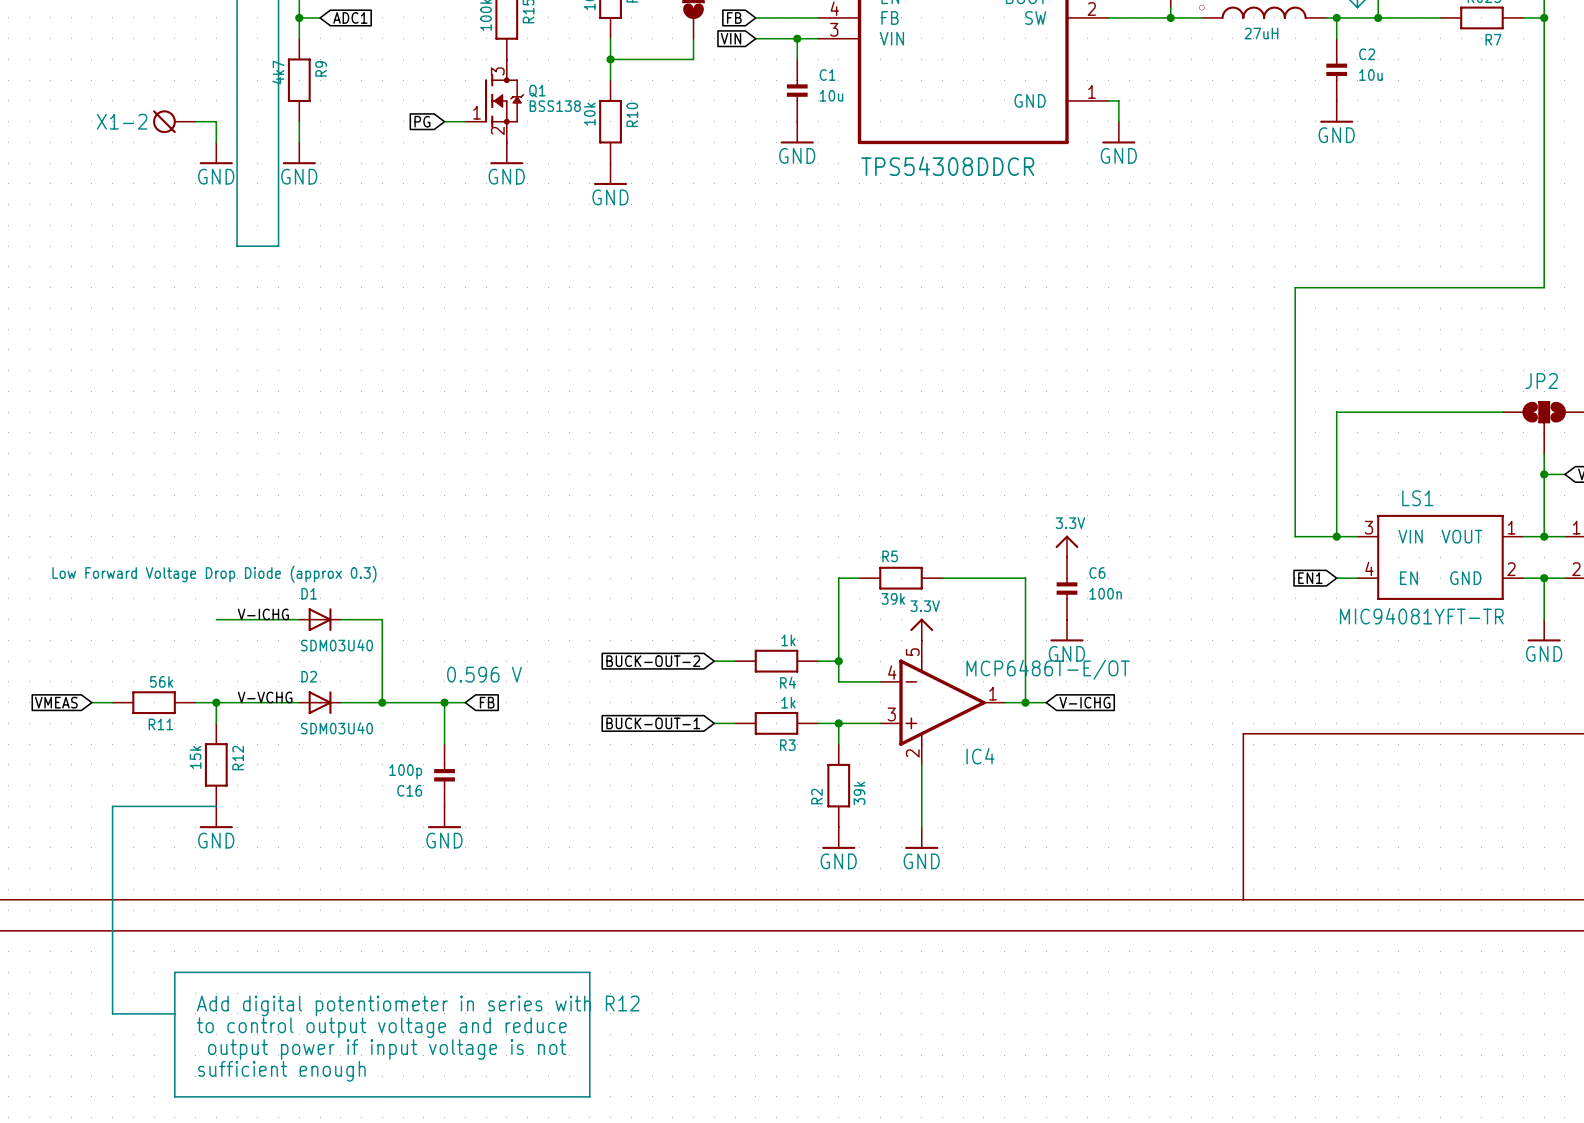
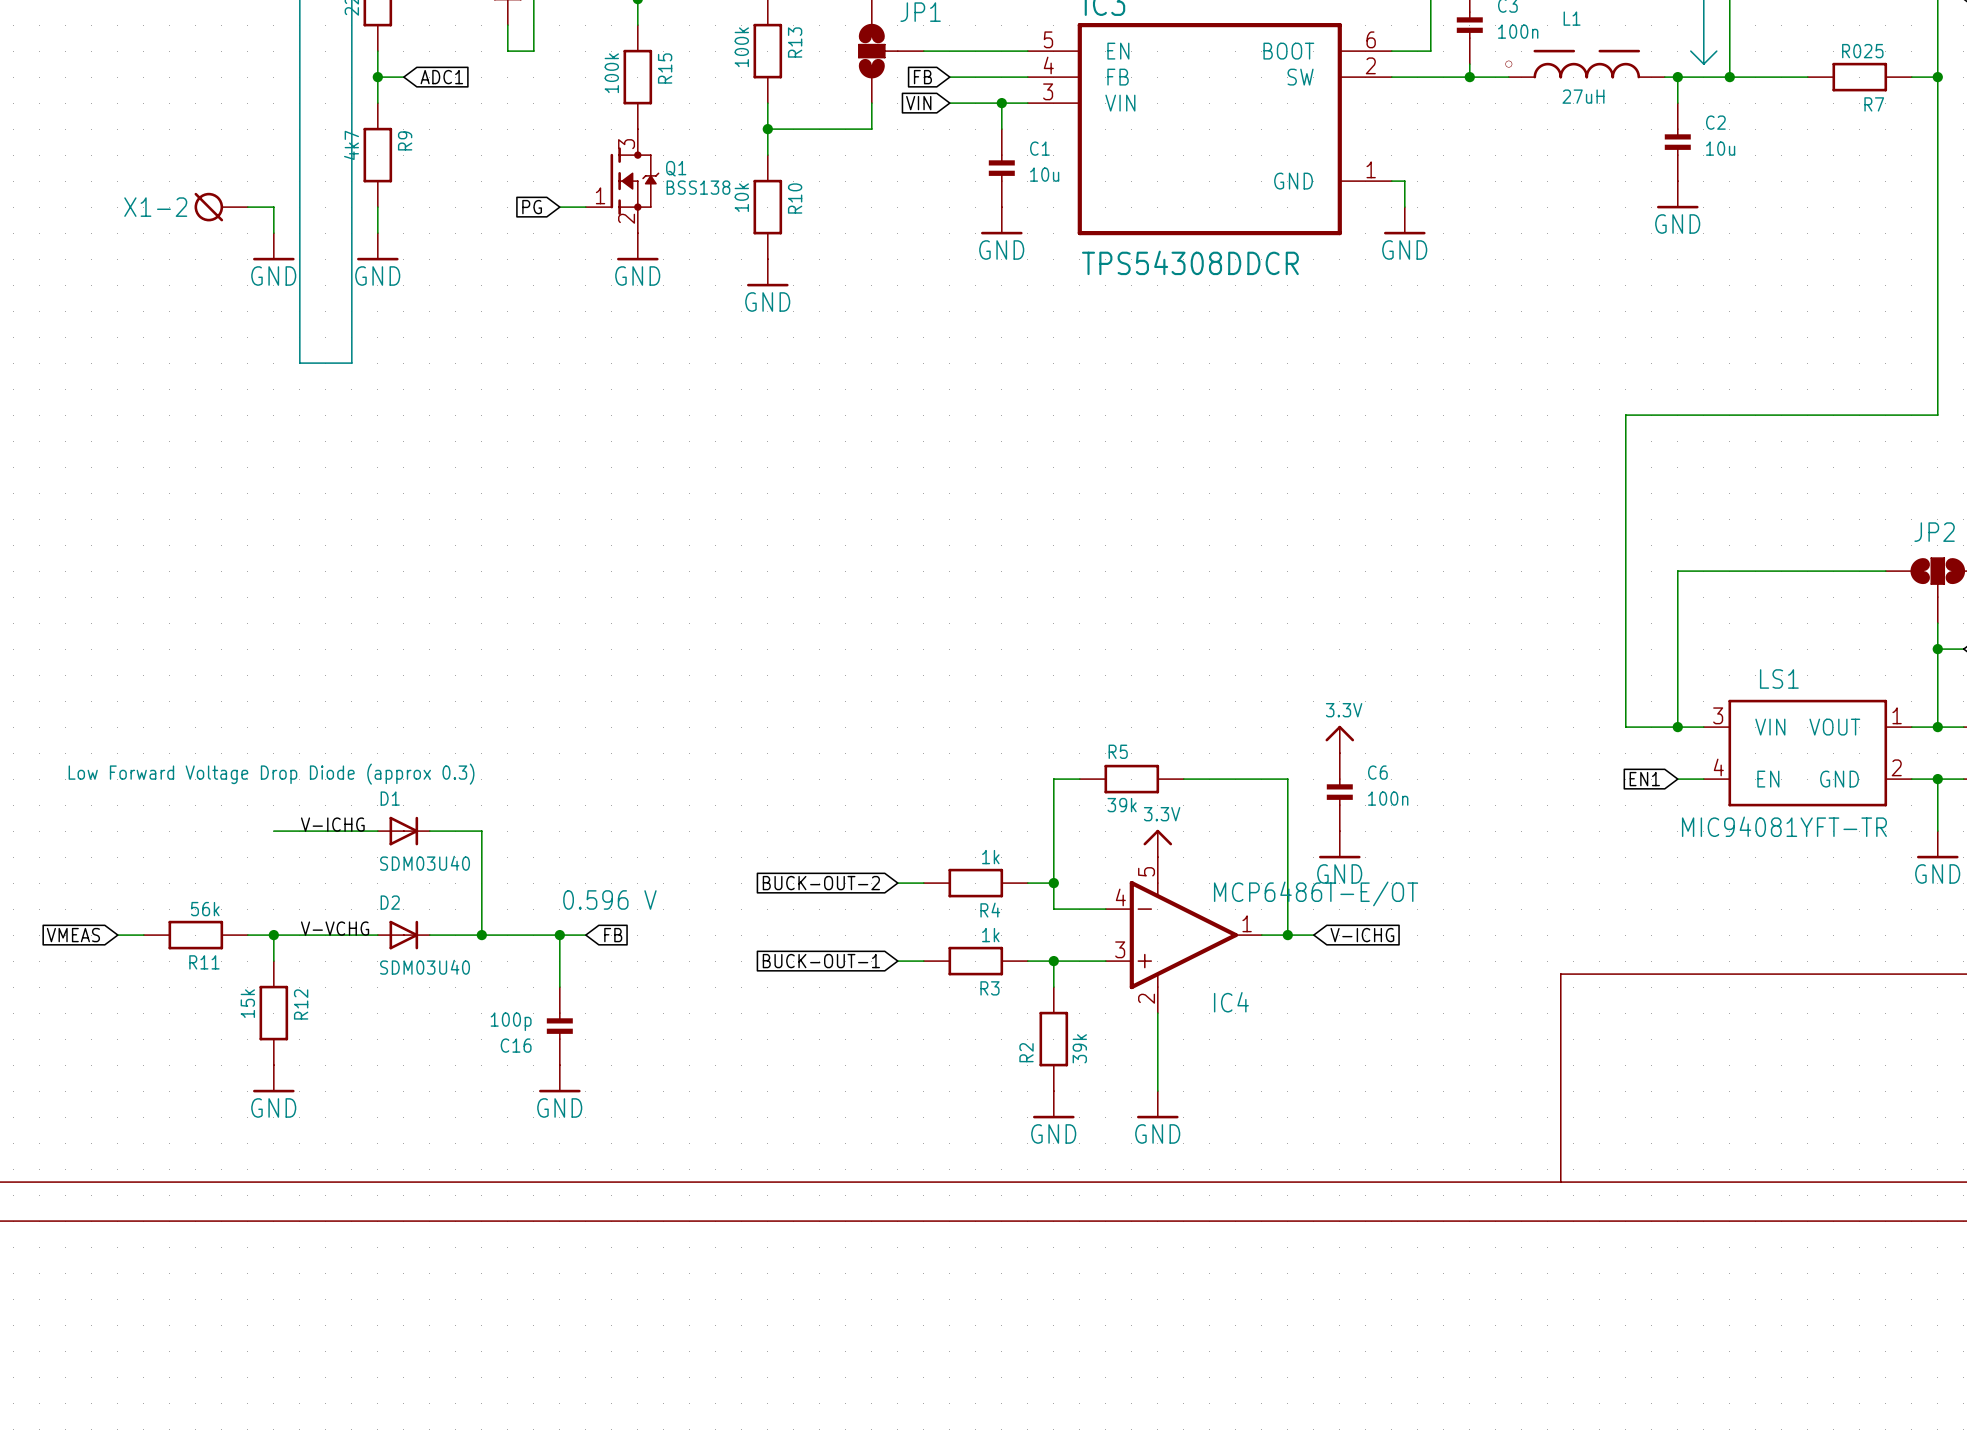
line: (216, 806) (112, 806) (112, 1013) (174, 1013) -> none
line: (174, 972) (174, 1096) (589, 1096) (589, 972) (174, 972) -> none
text: Add digital potentiometer in series with R12 (418, 1005) -> none
text: to control output voltage and reduce (381, 1027) -> none
text: output power if input voltage is not (387, 1049) -> none
text: sufficient enough (281, 1071) -> none

